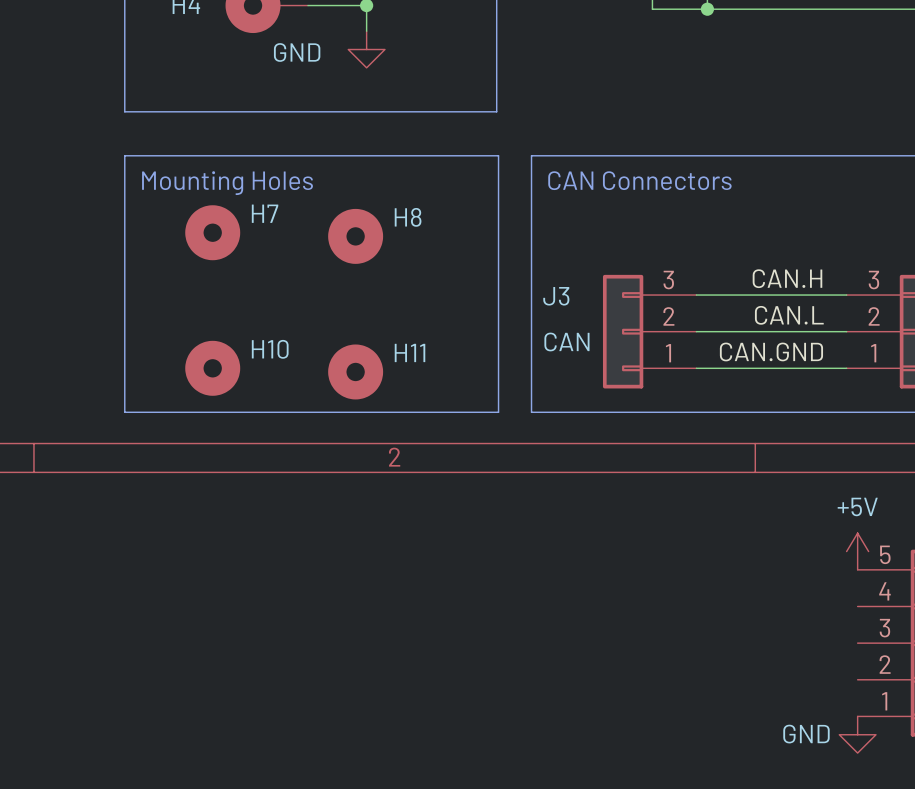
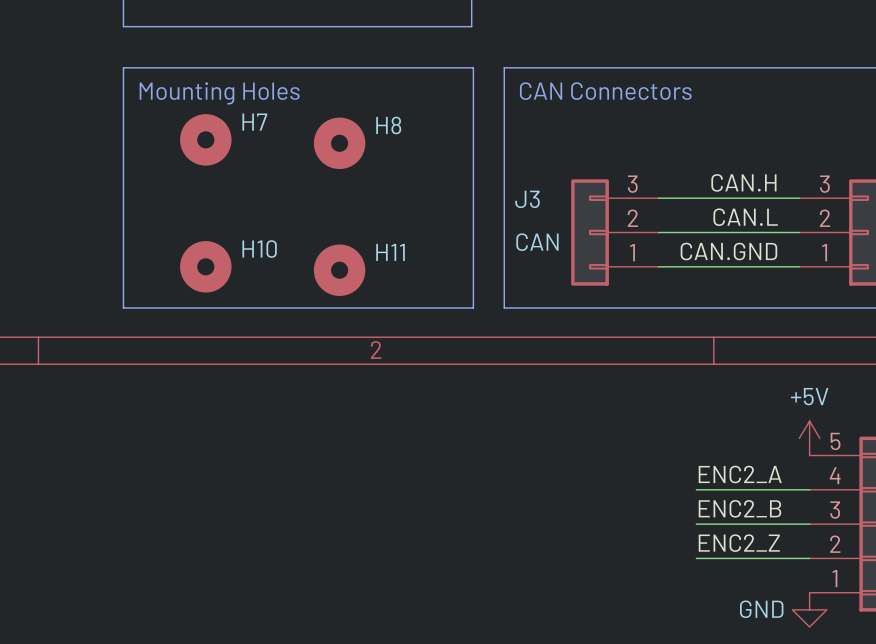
label: none -> ENC2_A (740, 474)
wire: none -> (696, 489) (809, 489)
label: none -> ENC2_B (739, 508)
wire: none -> (696, 524) (809, 524)
label: none -> ENC2_Z (739, 543)
wire: none -> (696, 558) (809, 558)

